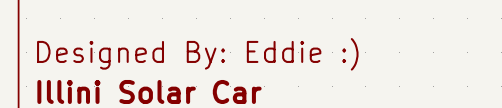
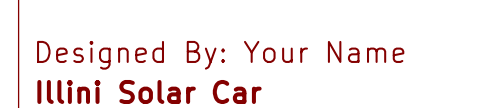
title block: Designed By: Eddie :) (197, 54) -> Designed By: Your Name (220, 55)

